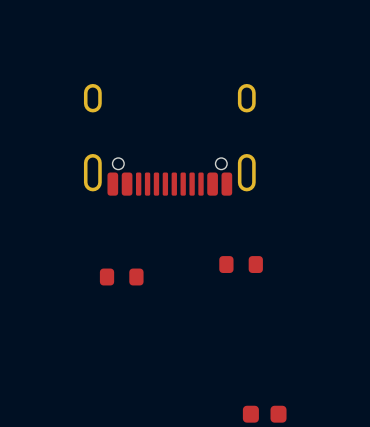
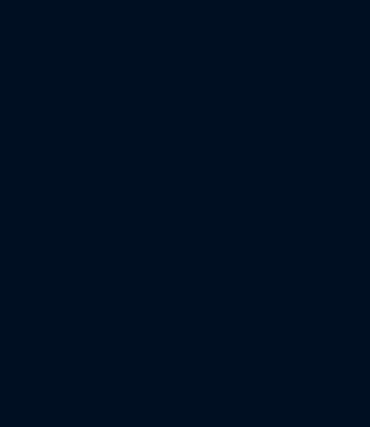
part: (169, 139) -> none
part: (241, 264) -> none
part: (121, 277) -> none
part: (264, 414) -> none

